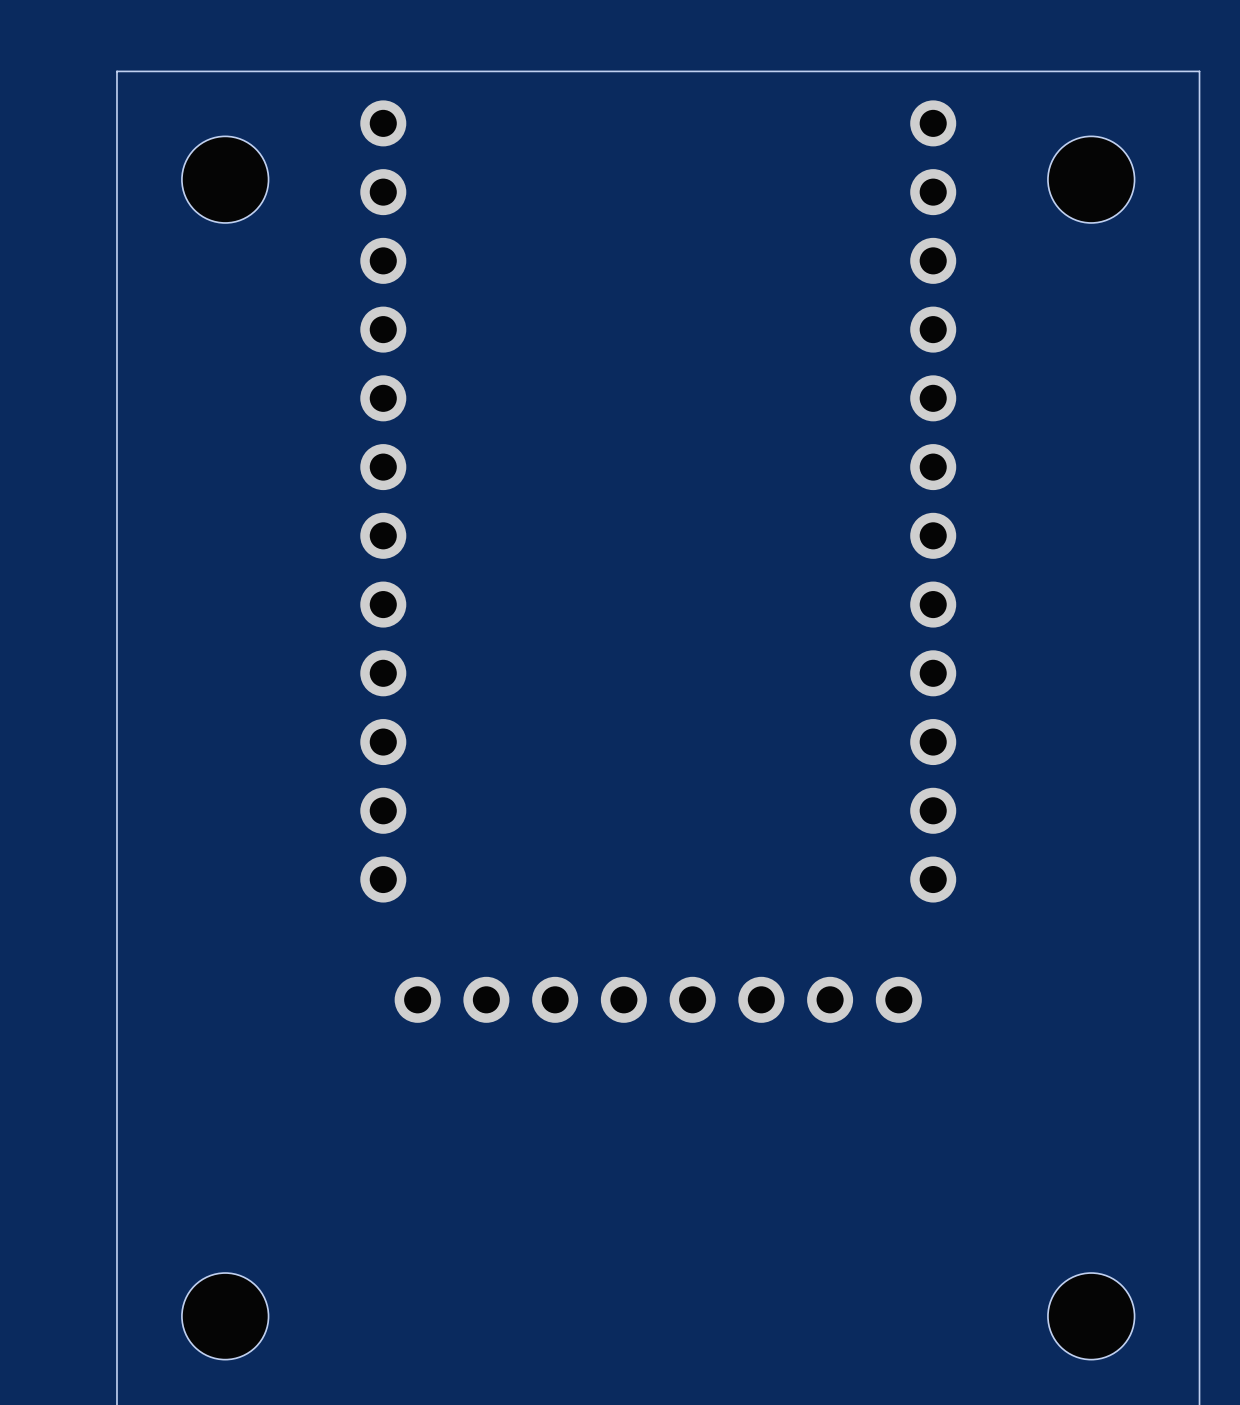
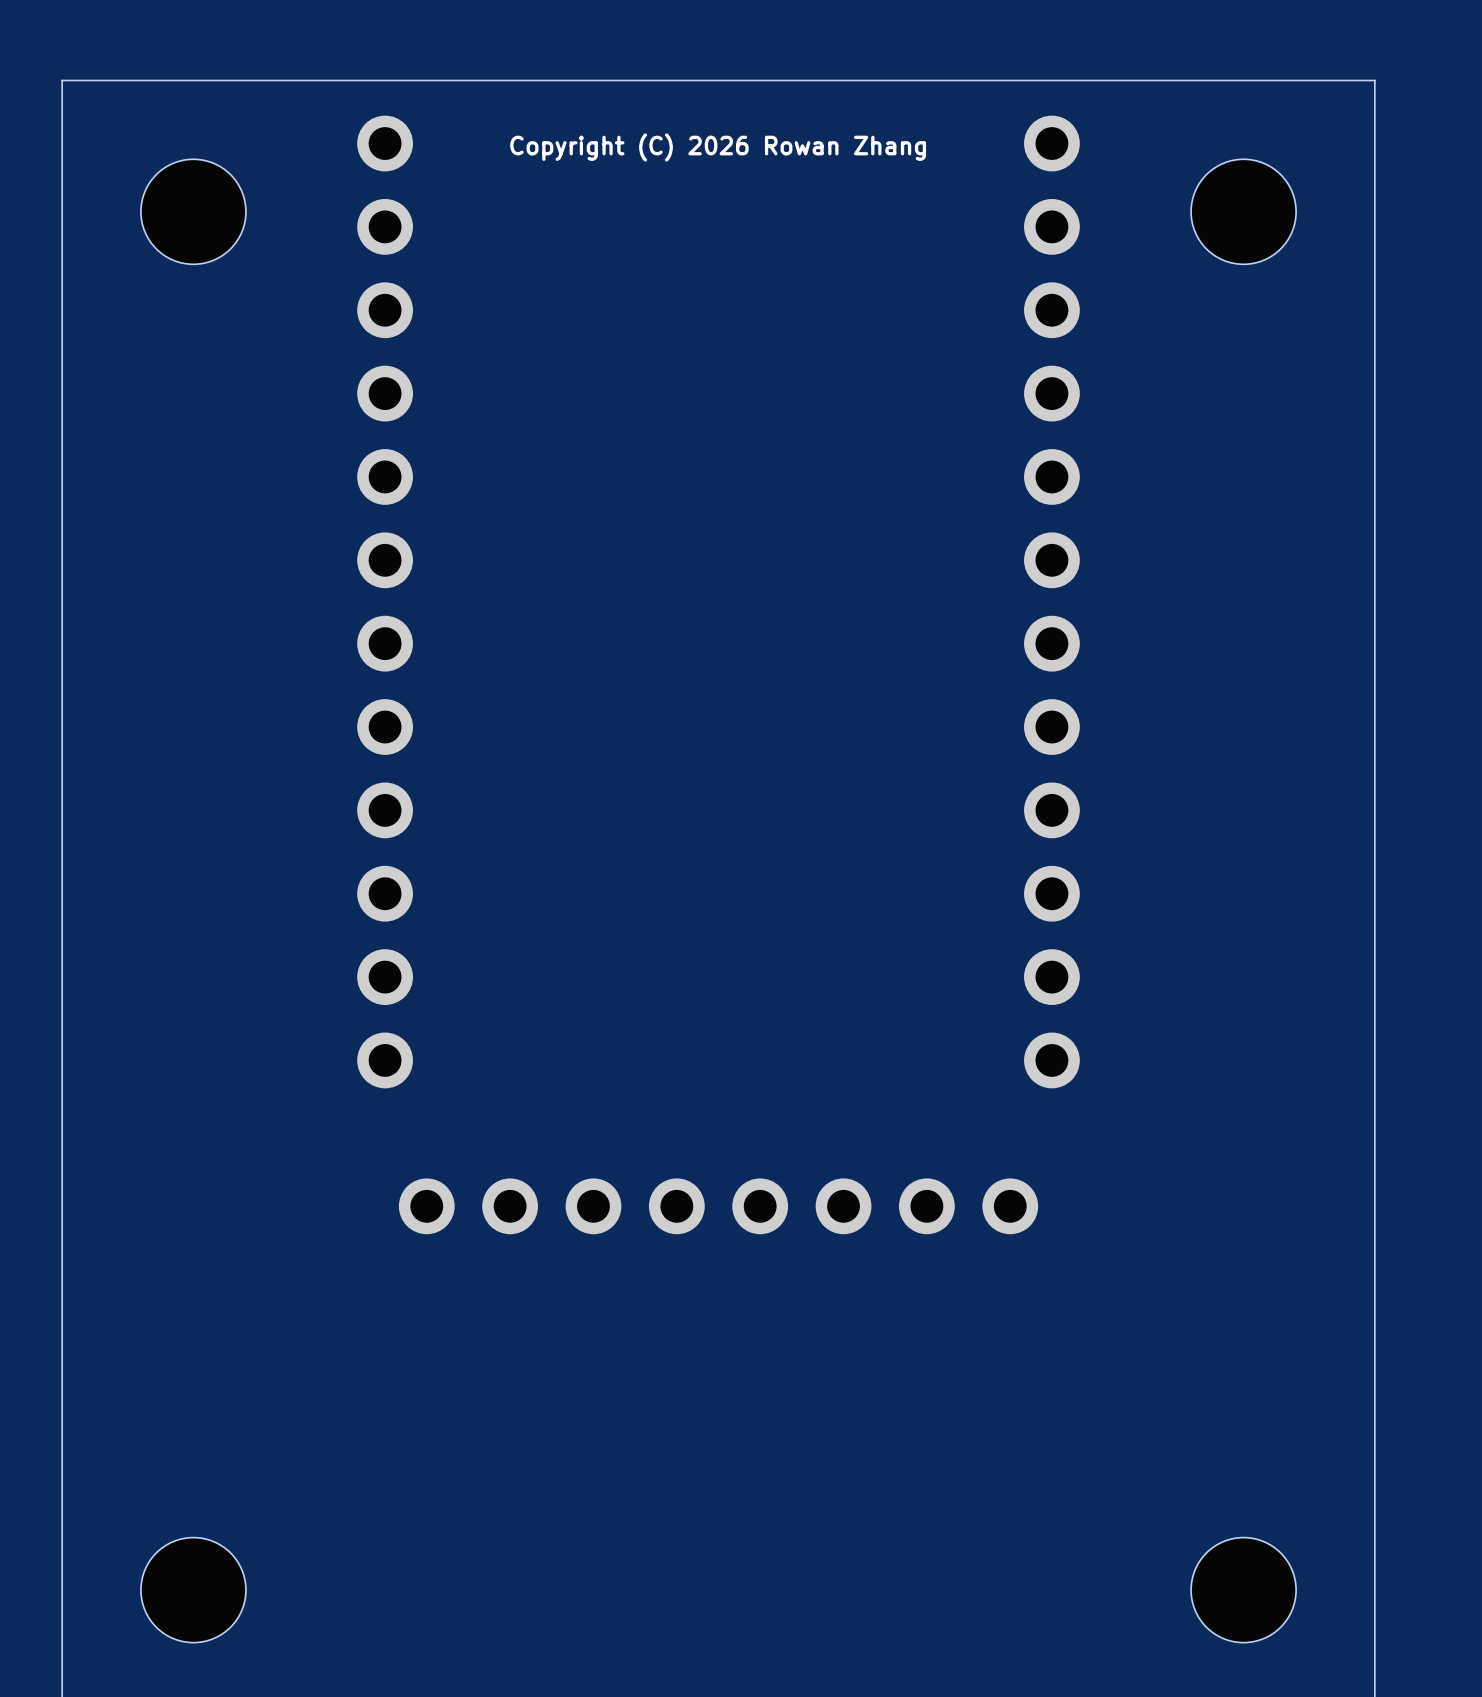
text: none -> Copyright (C) 2026 Rowan Zhang (718, 147)

